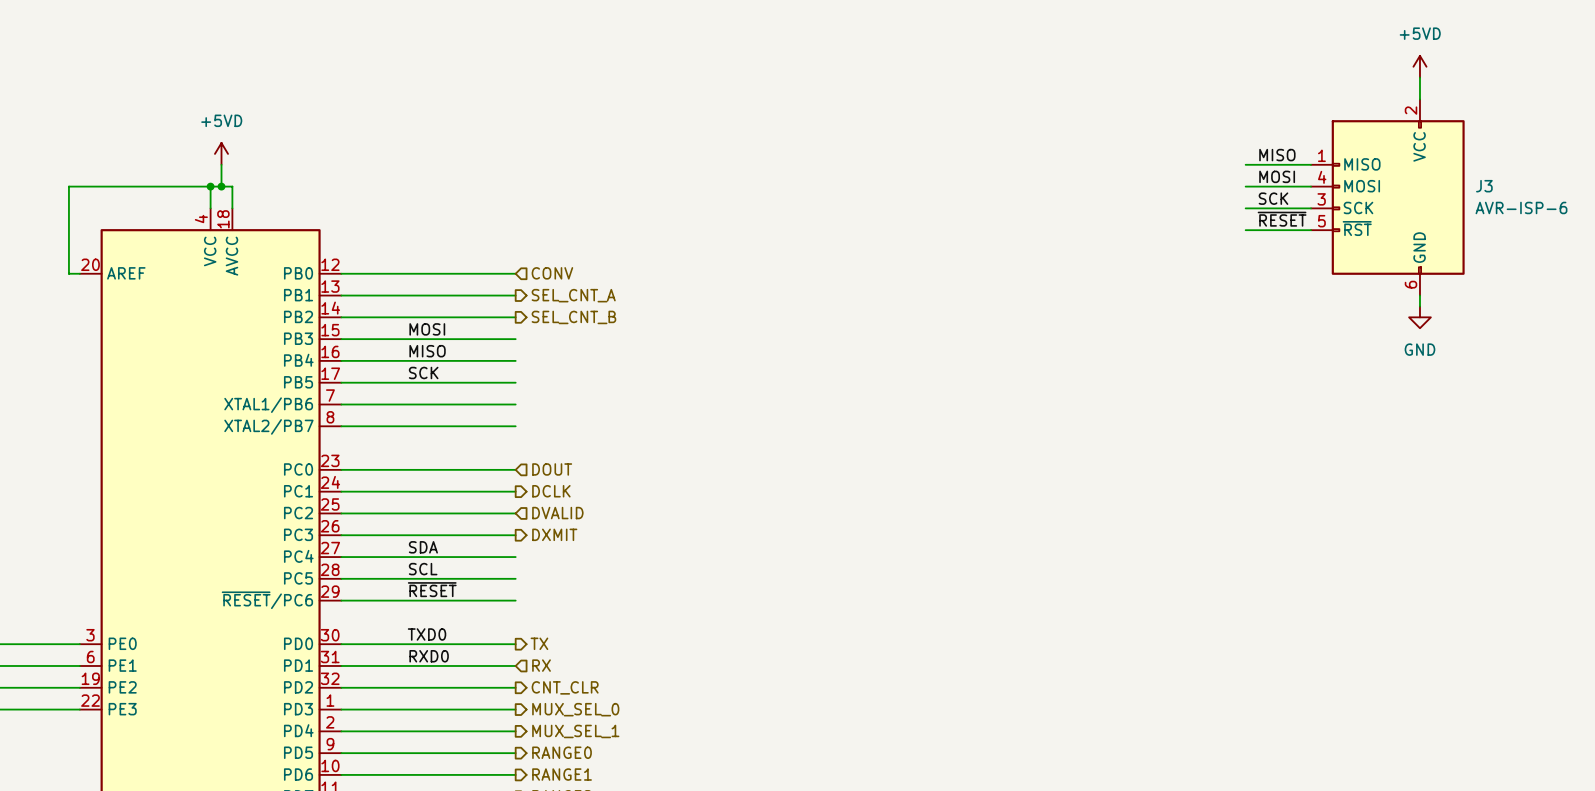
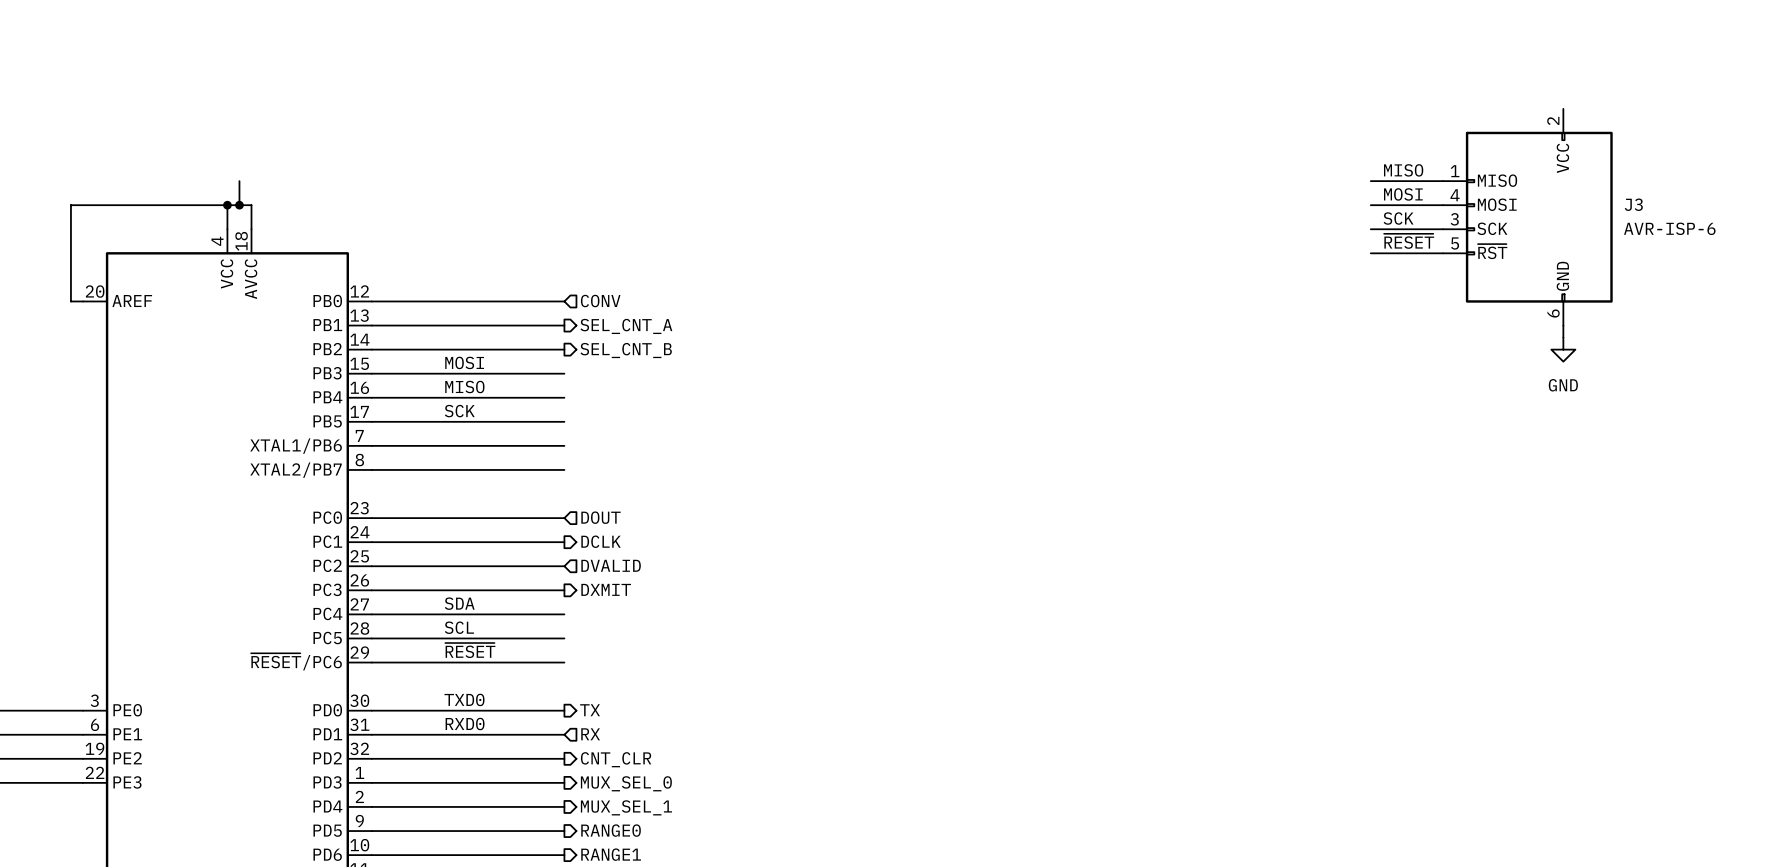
power symbol: +5VD (1419, 66) -> none
wire: (1419, 77) (1419, 99) -> none
power symbol: +5VD (221, 153) -> none

